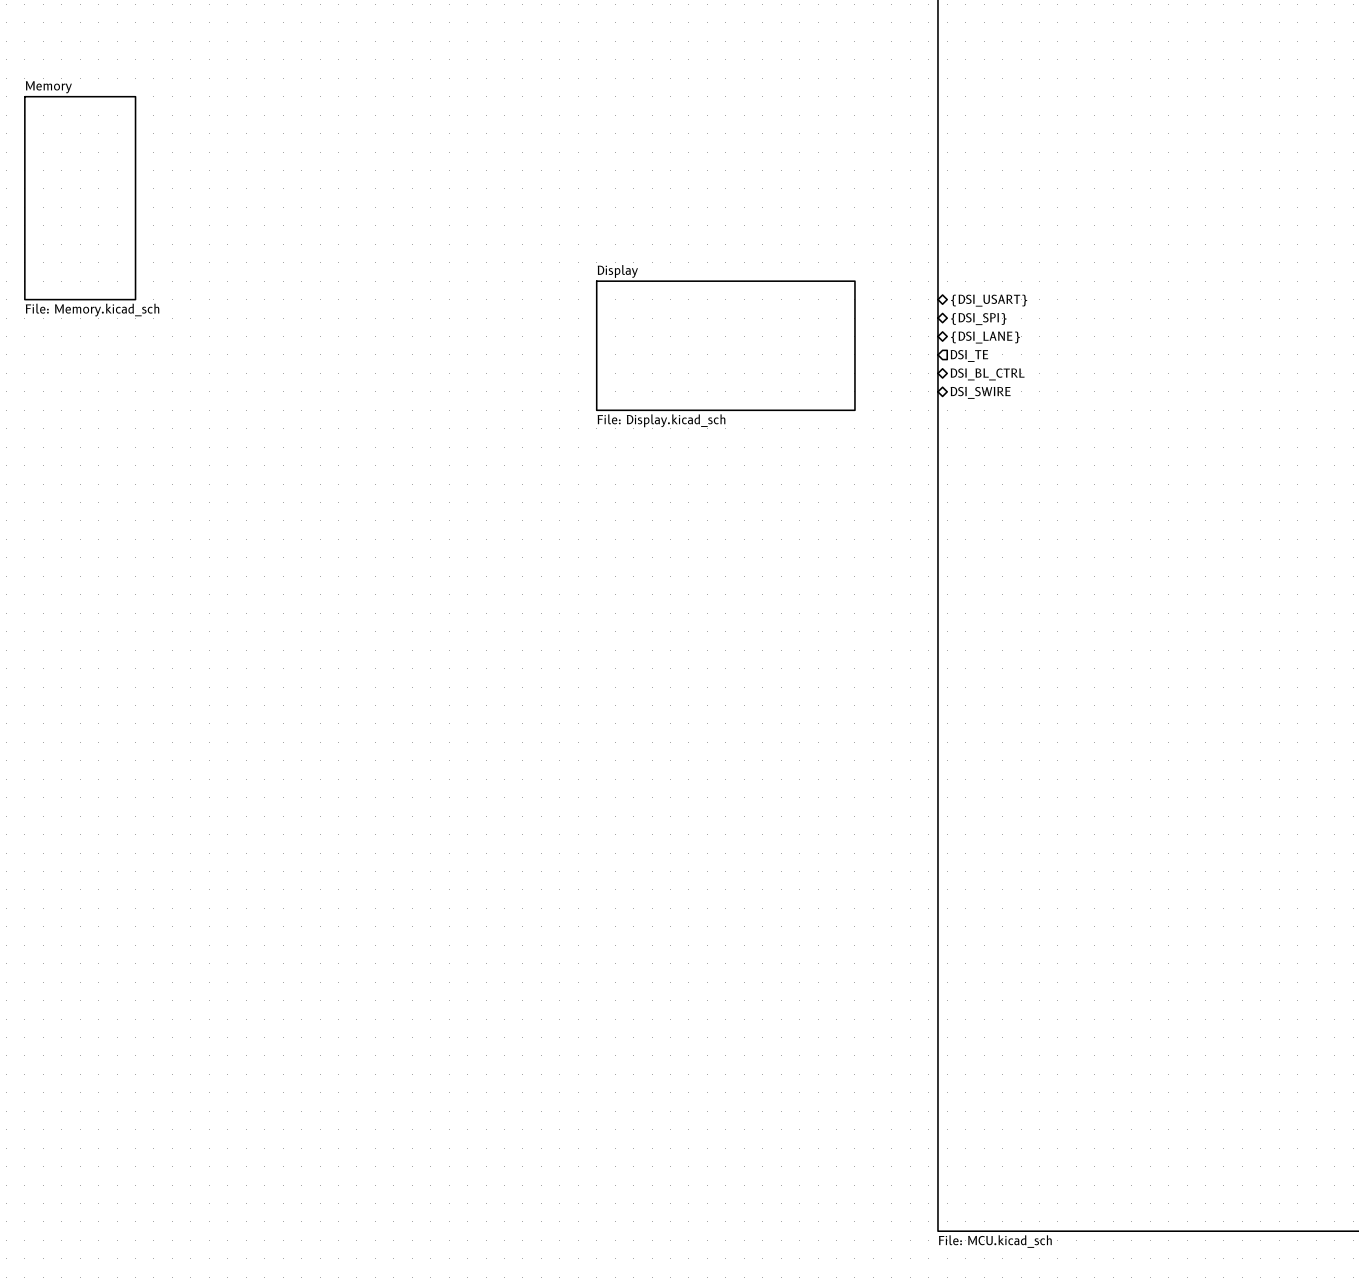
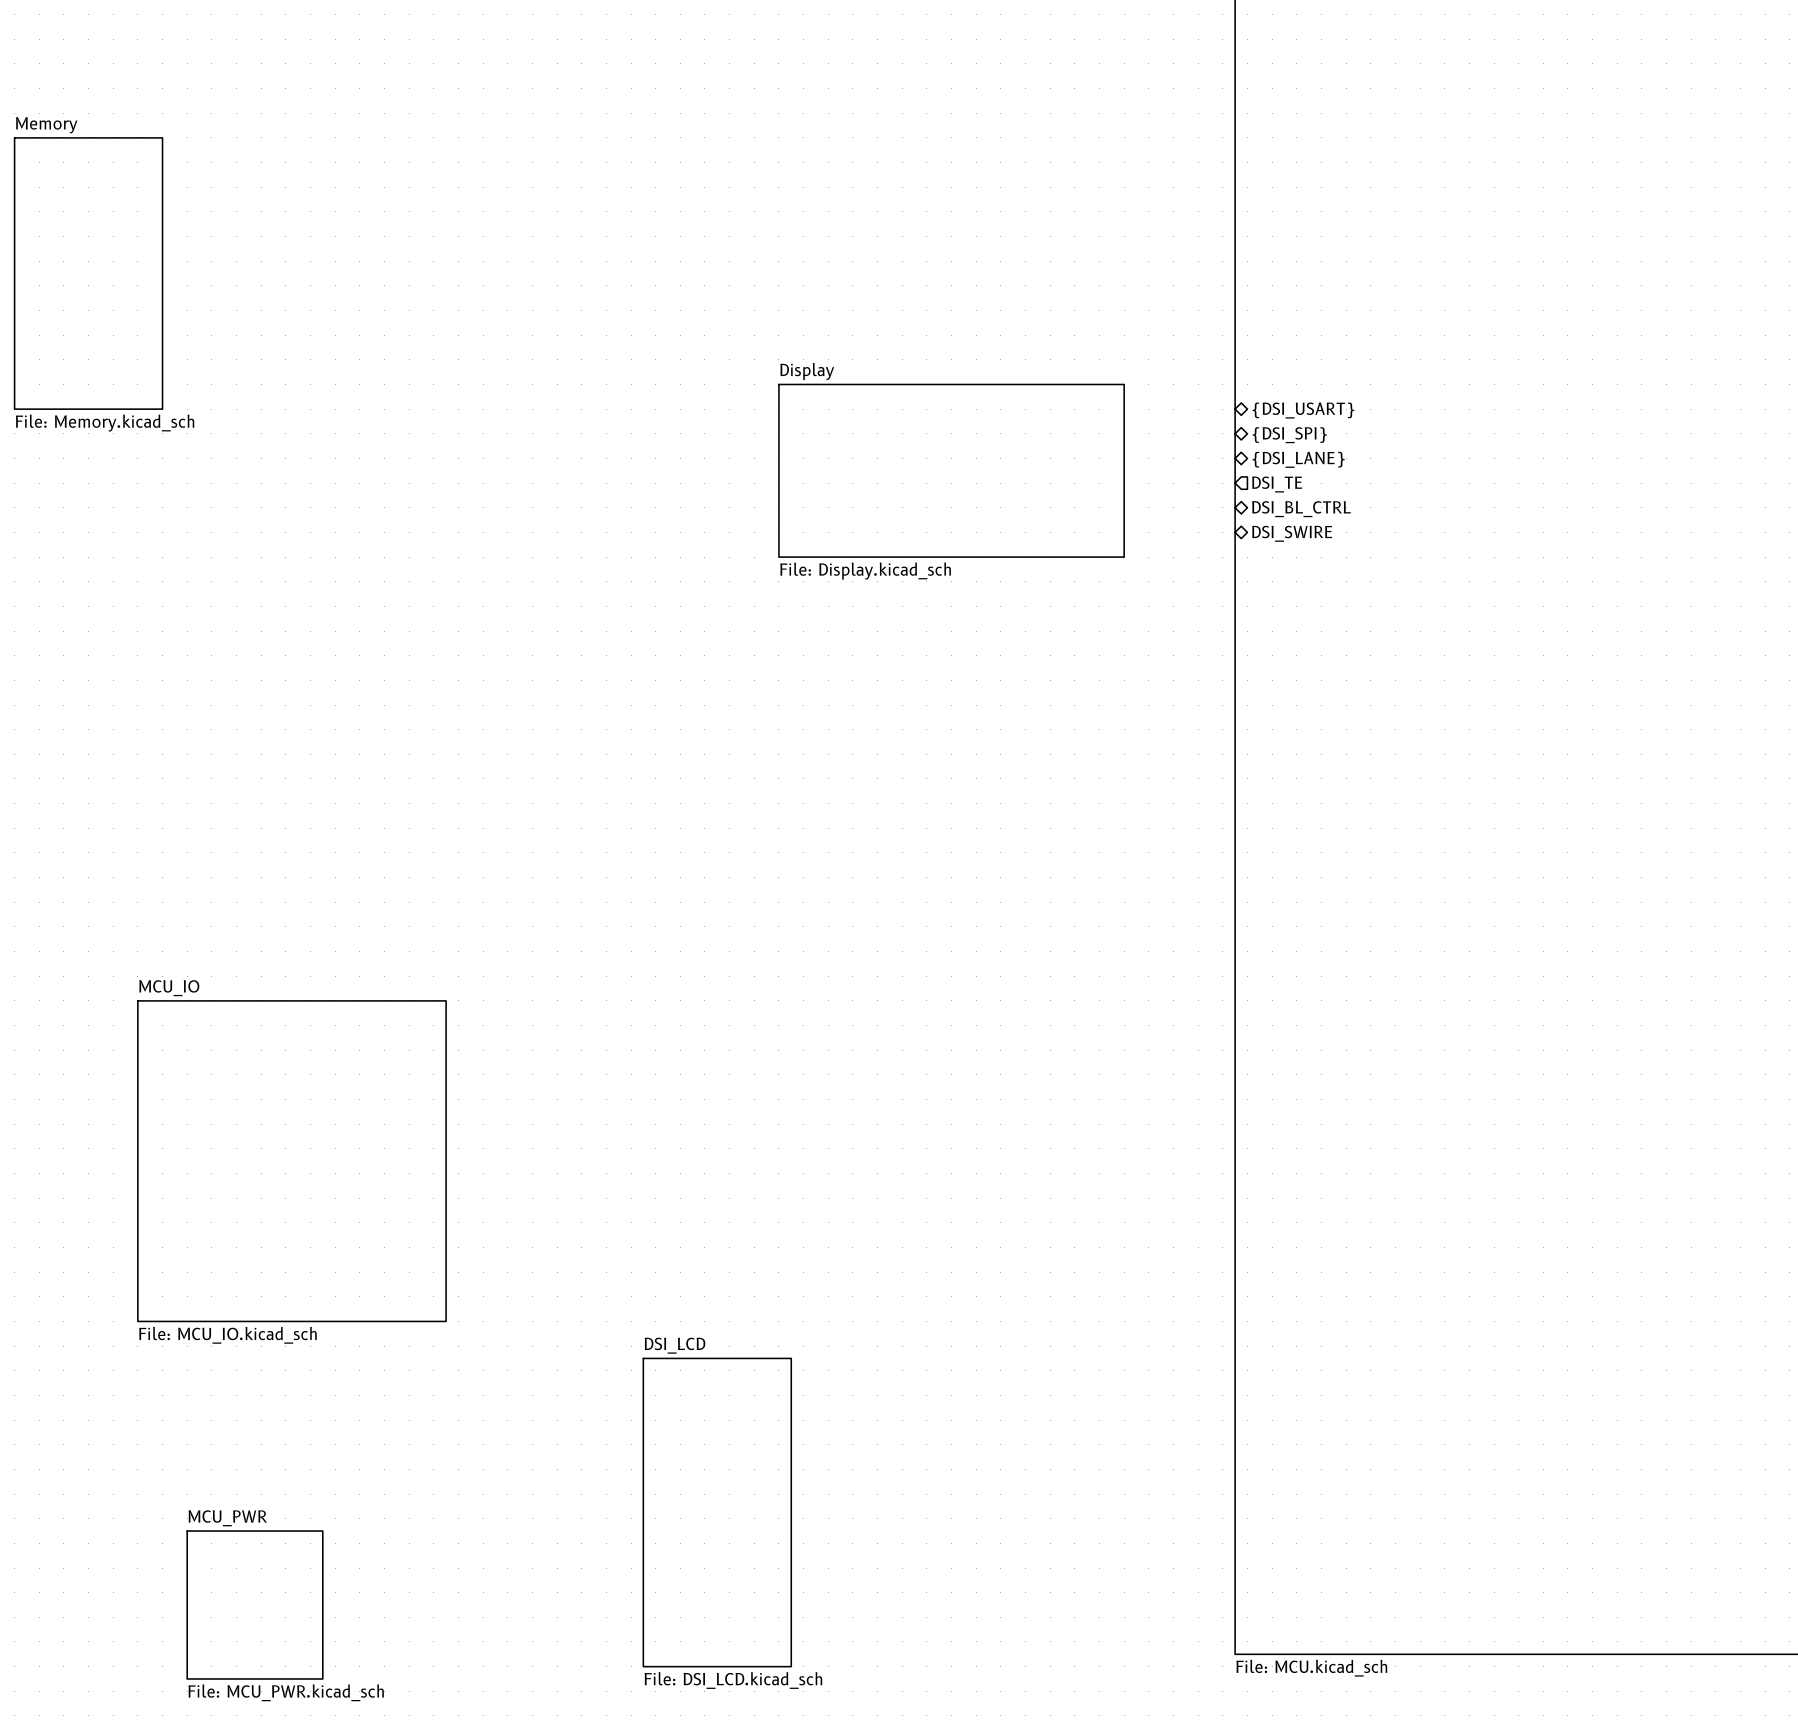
sheet MCU_IO: none -> File: MCU_IO.kicad_sch (291, 1161)
sheet DSI_LCD: none -> File: DSI_LCD.kicad_sch (717, 1512)
sheet MCU_PWR: none -> File: MCU_PWR.kicad_sch (254, 1605)

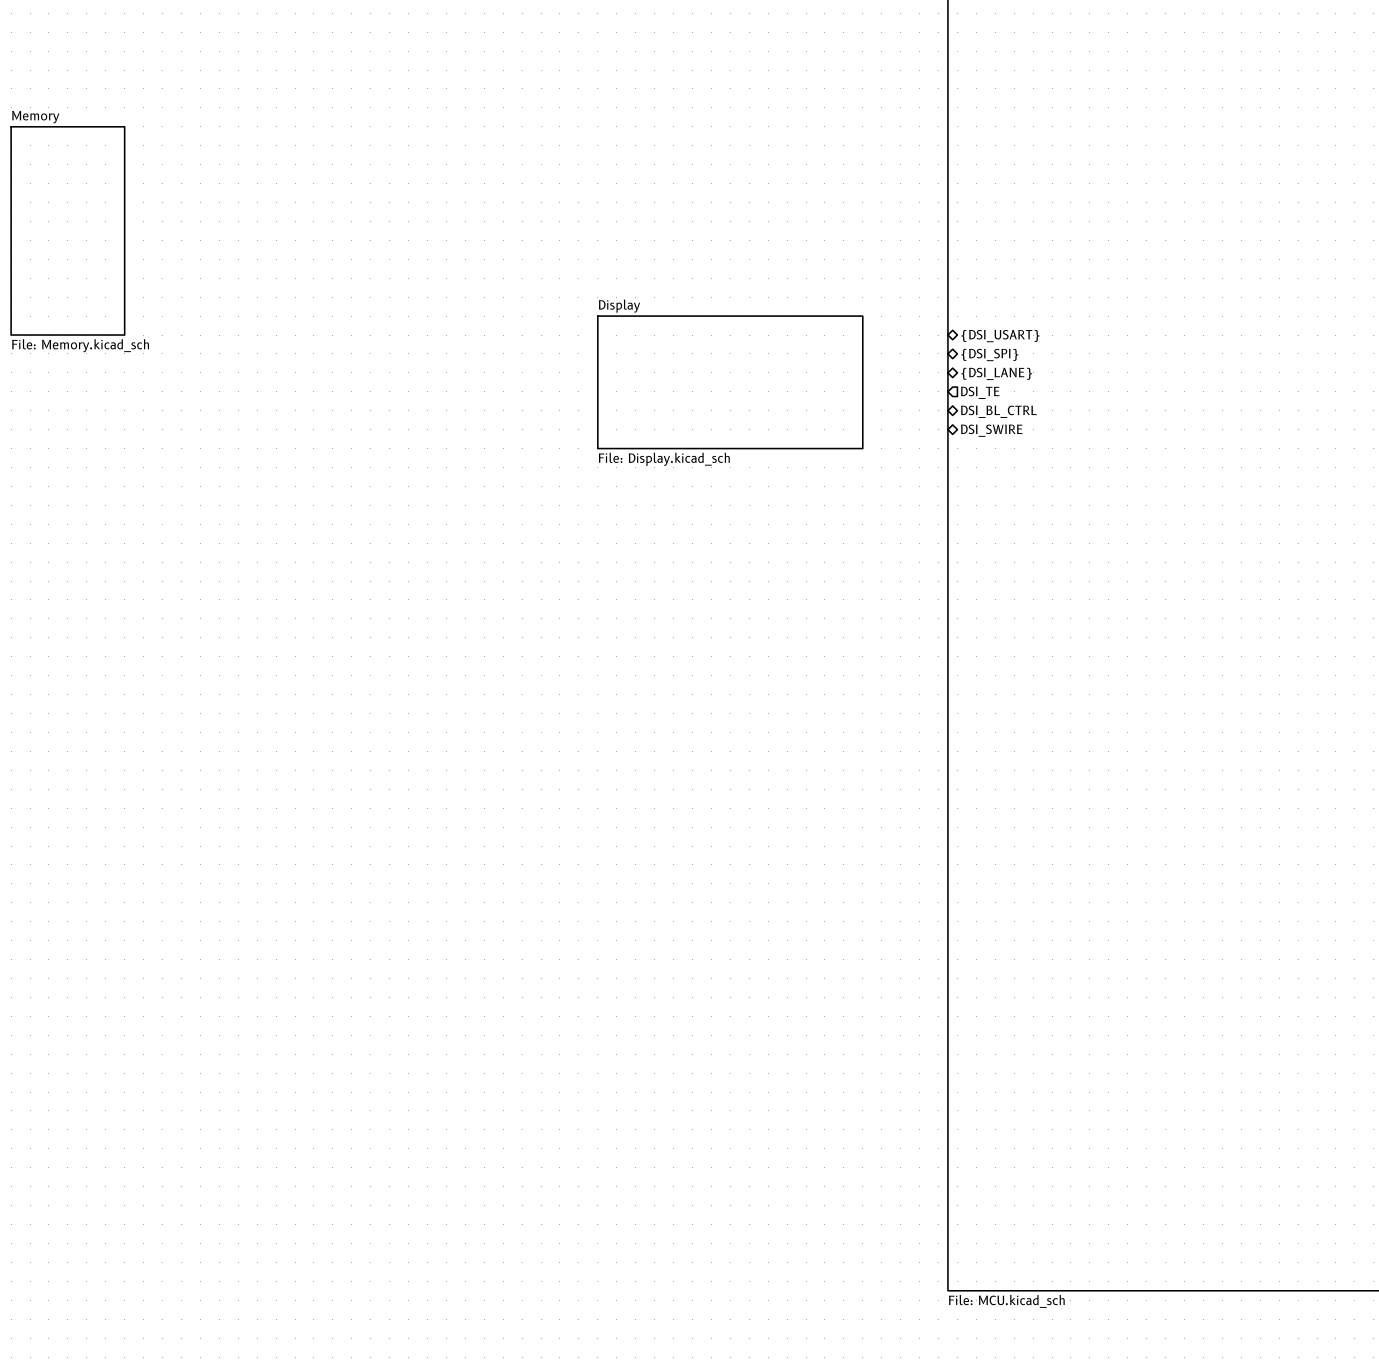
sheet MCU_IO: File: MCU_IO.kicad_sch (291, 1161) -> none
sheet DSI_LCD: File: DSI_LCD.kicad_sch (717, 1512) -> none
sheet MCU_PWR: File: MCU_PWR.kicad_sch (254, 1605) -> none

